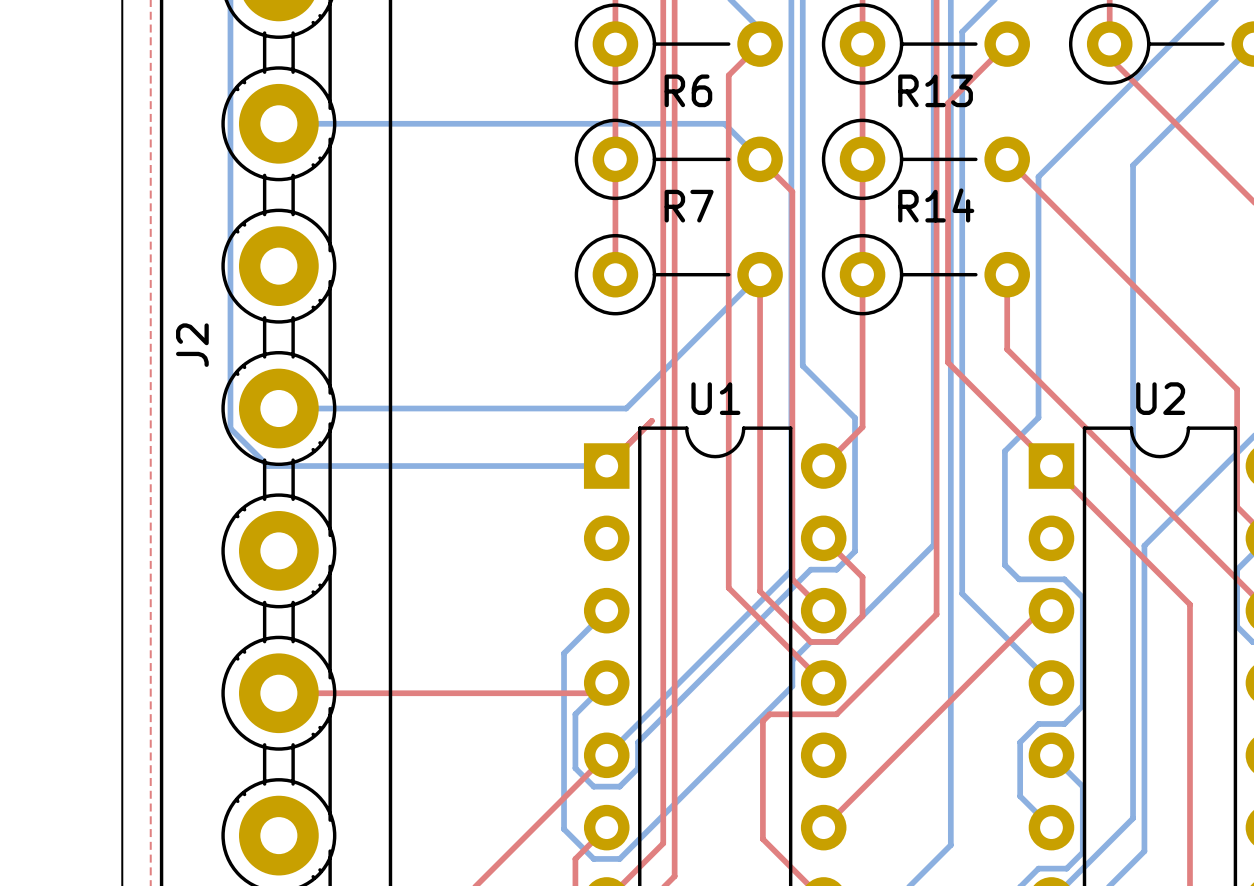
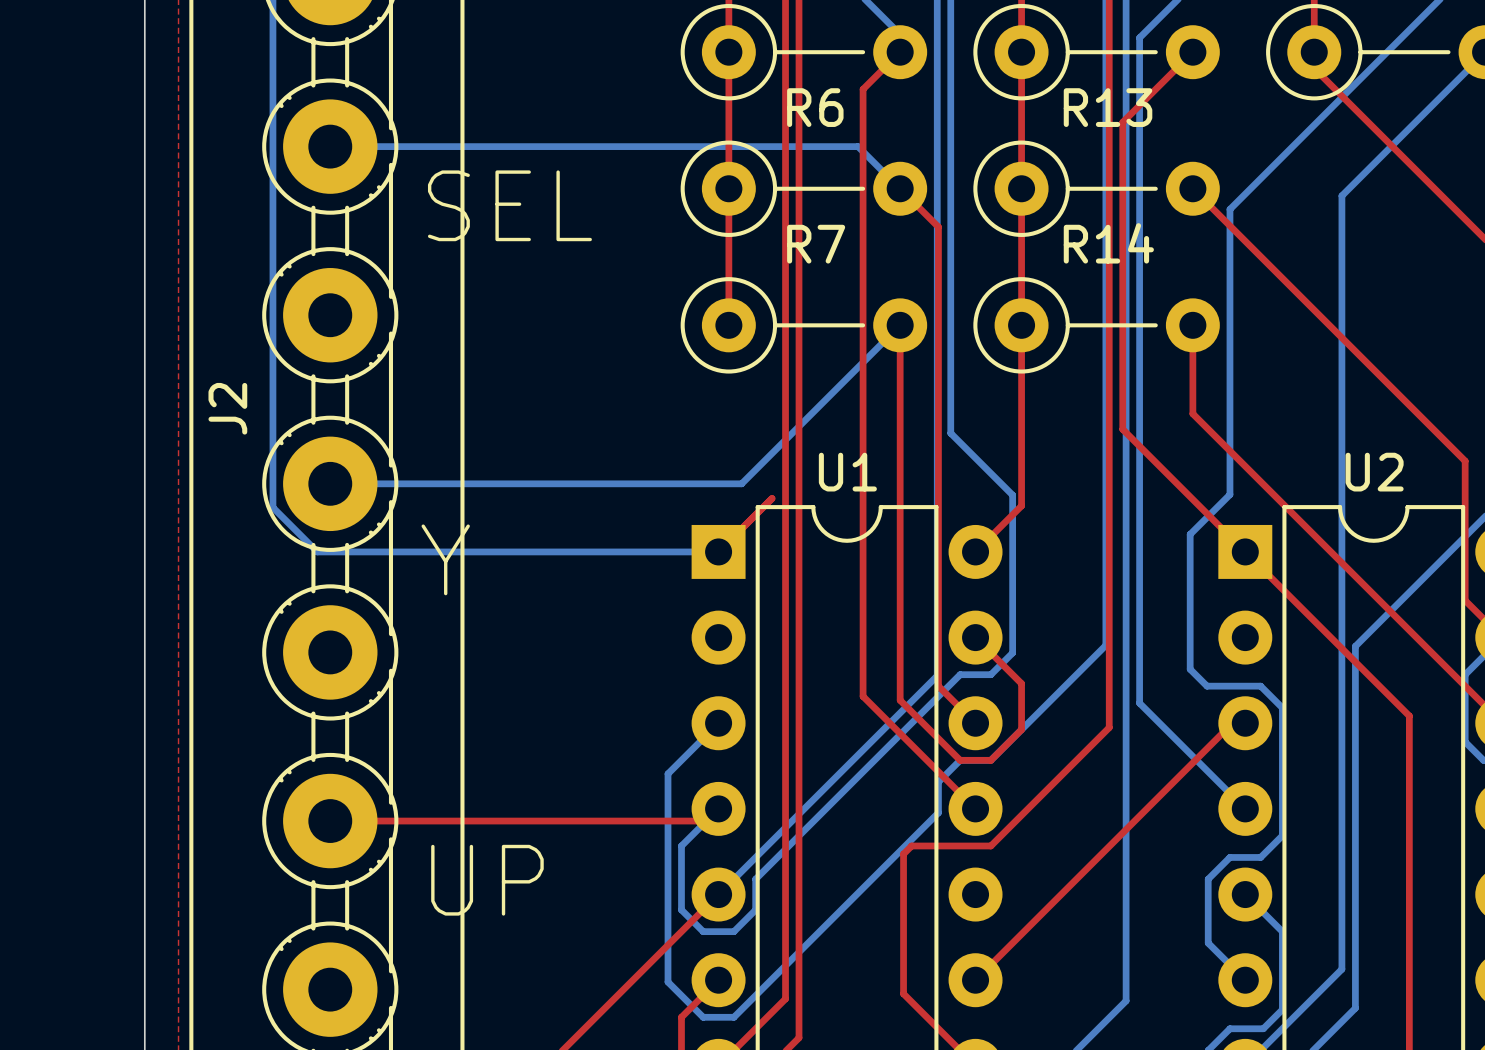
text: none -> SEL (509, 205)
text: none -> Y (445, 559)
text: none -> UP (487, 880)

